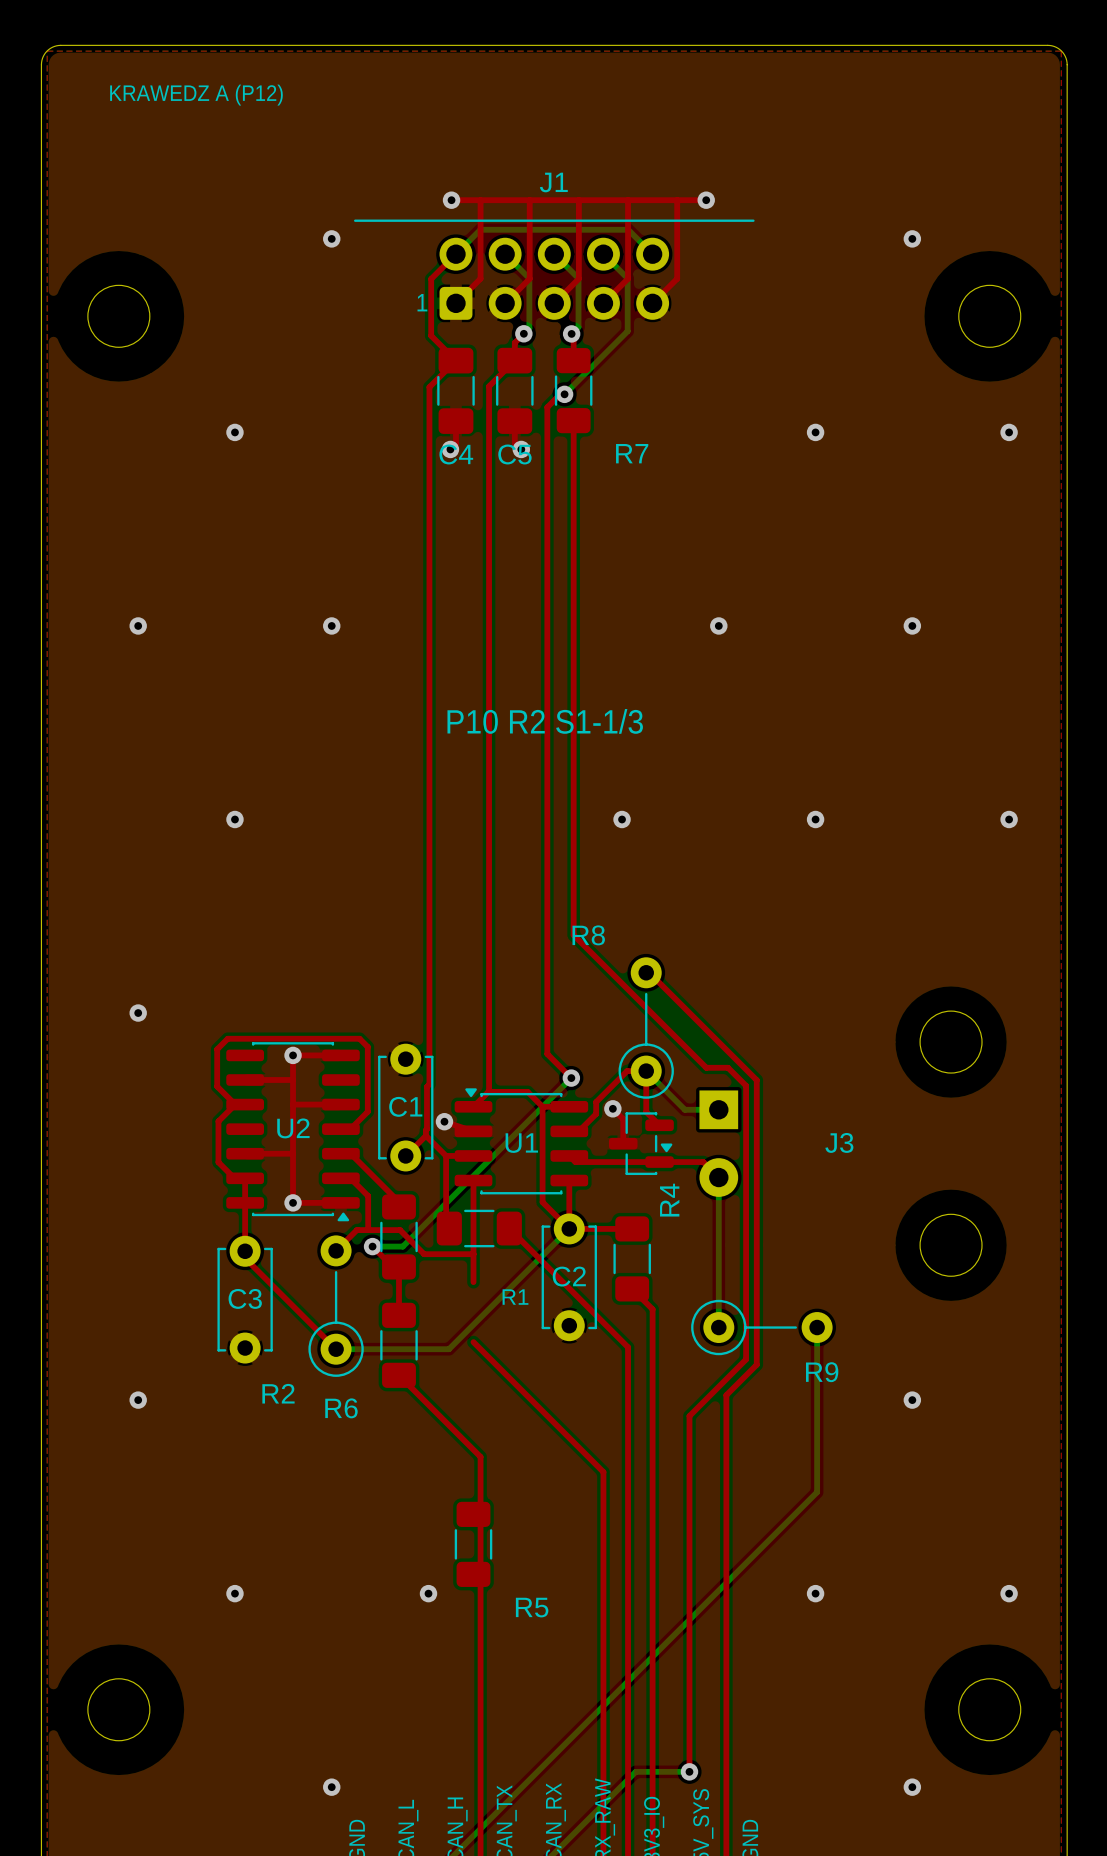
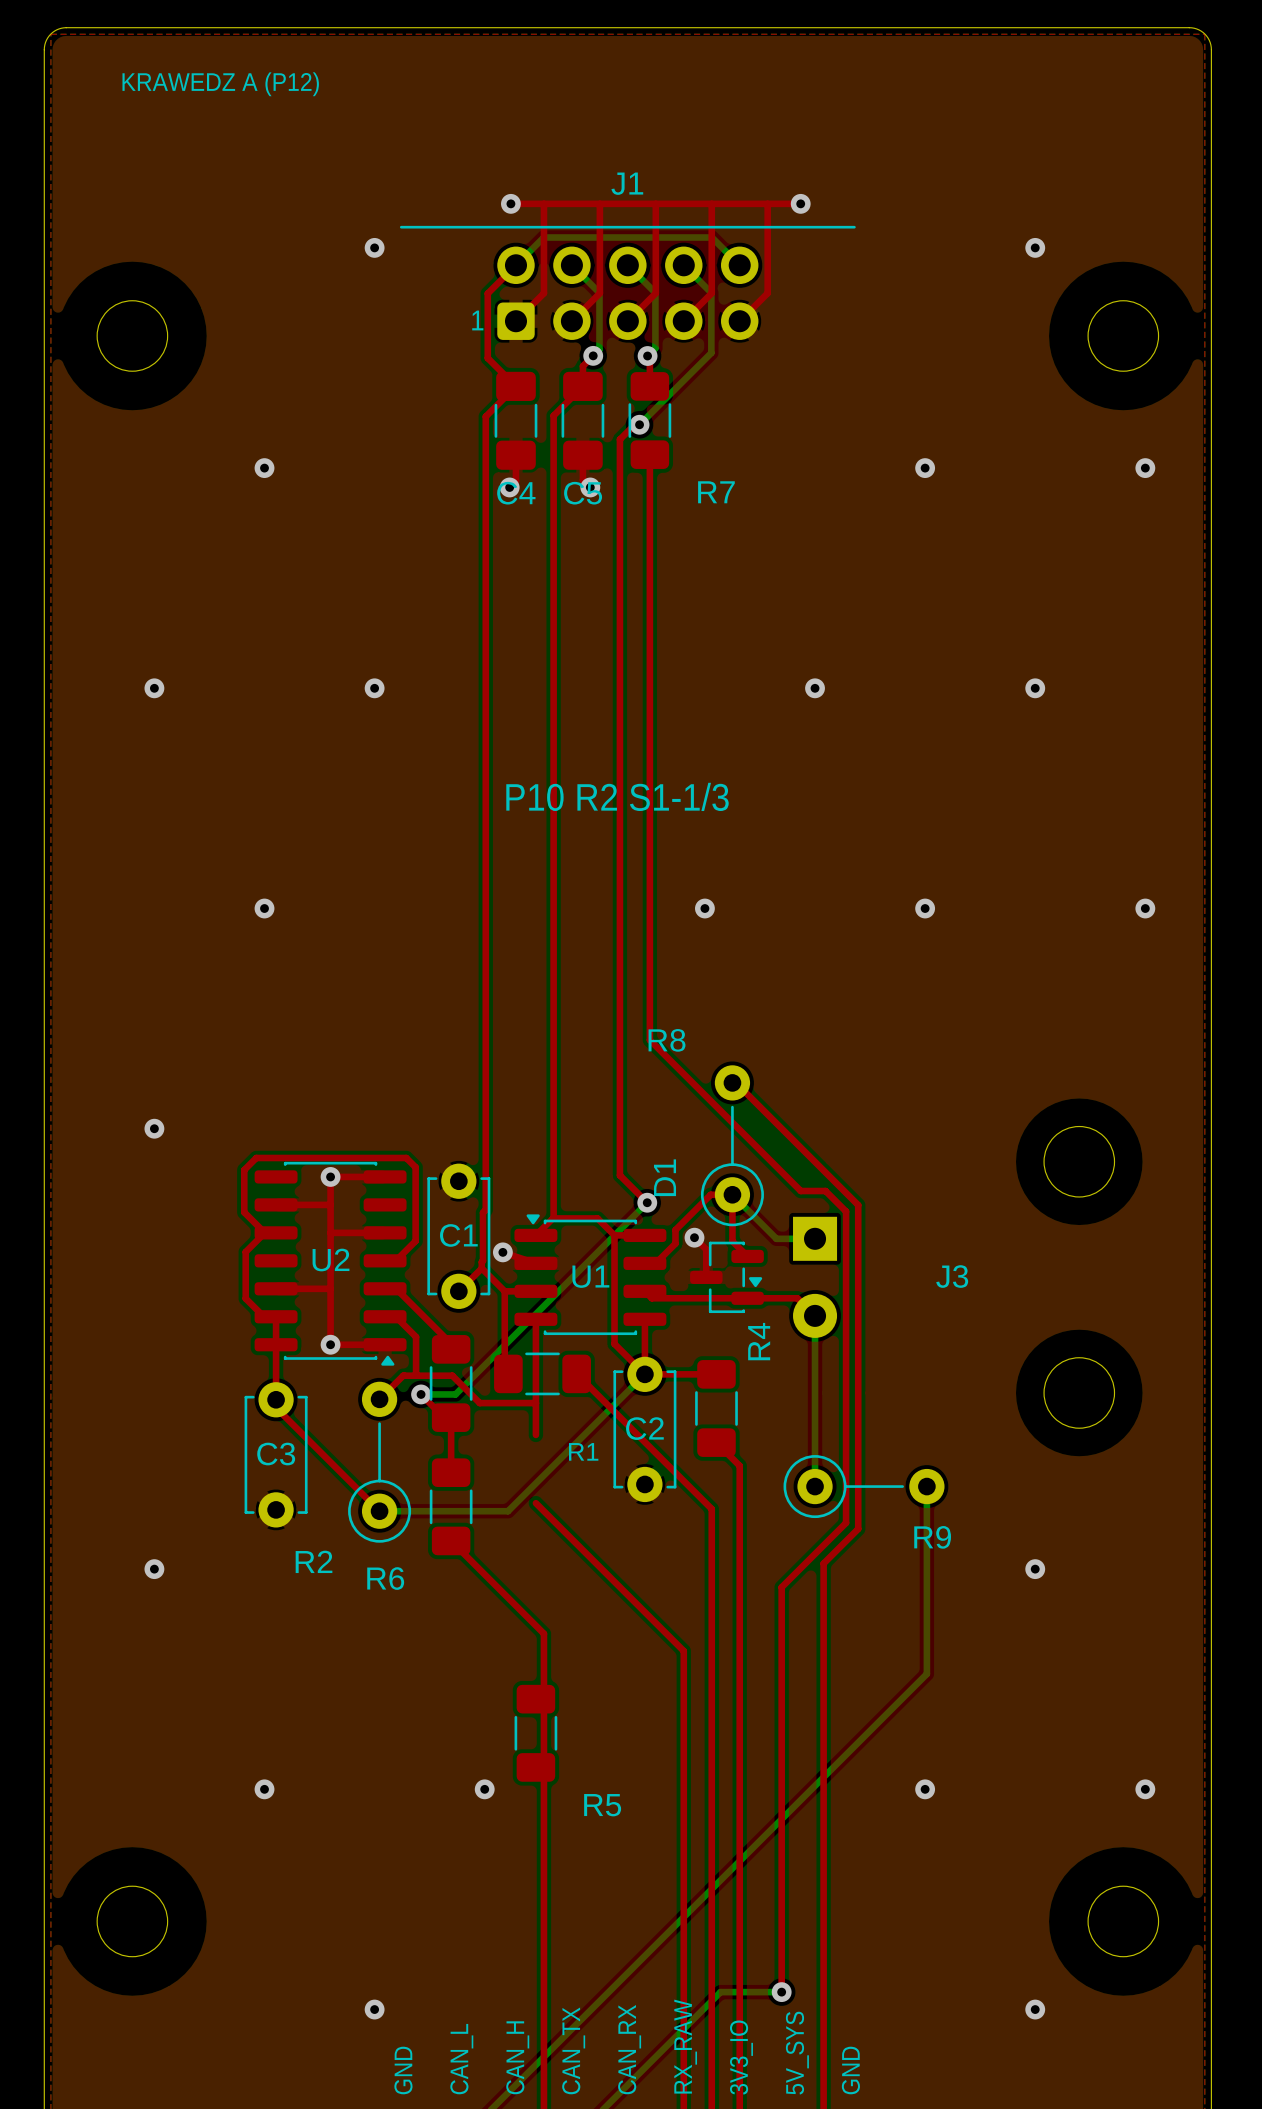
D1 name: none -> D1 (665, 1177)

